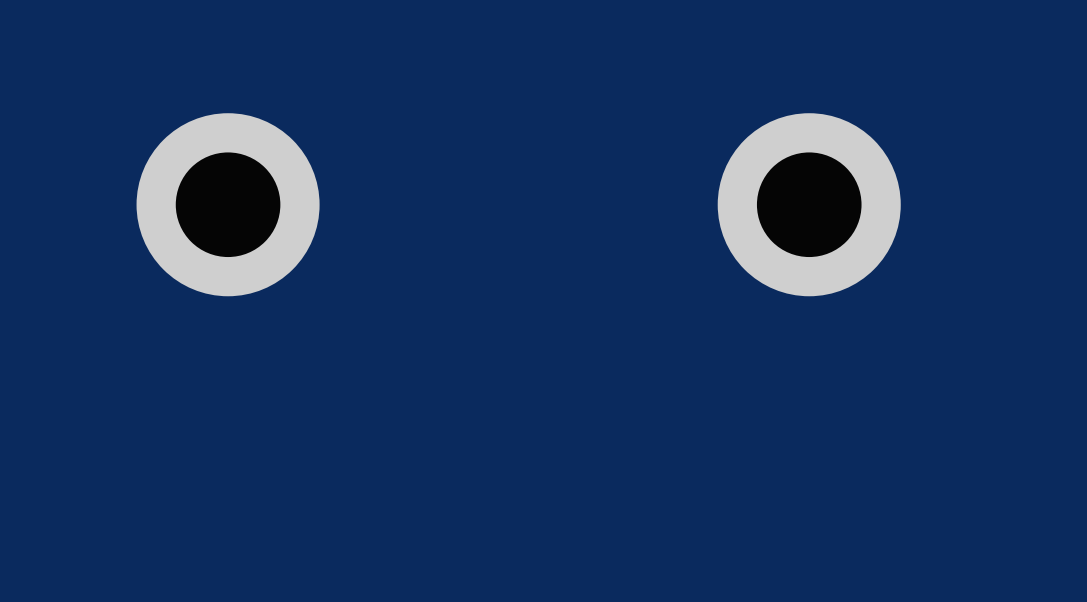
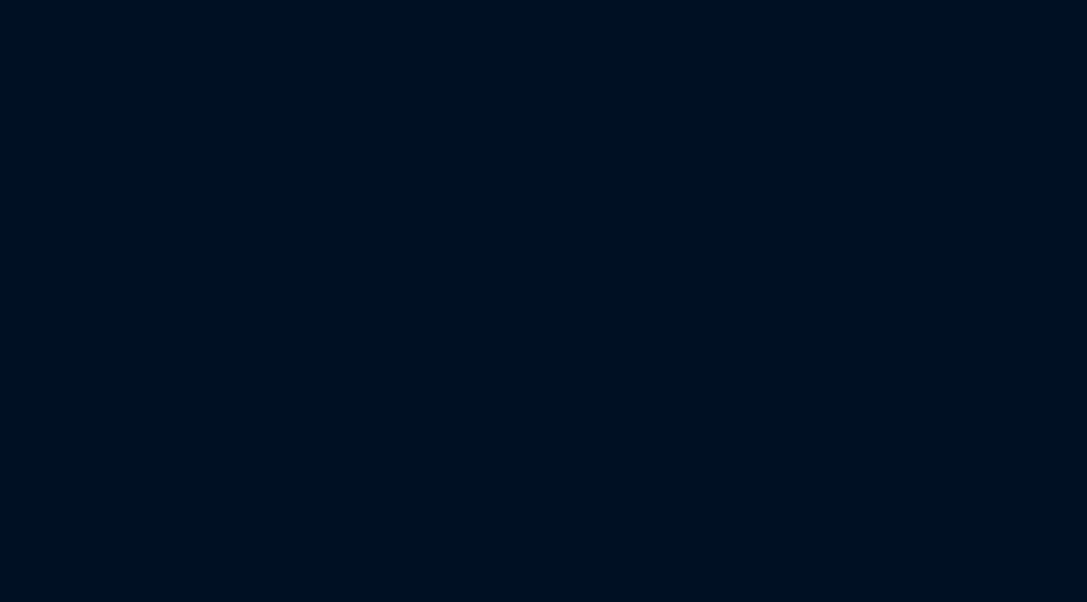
part: (228, 204) -> none
part: (809, 204) -> none

